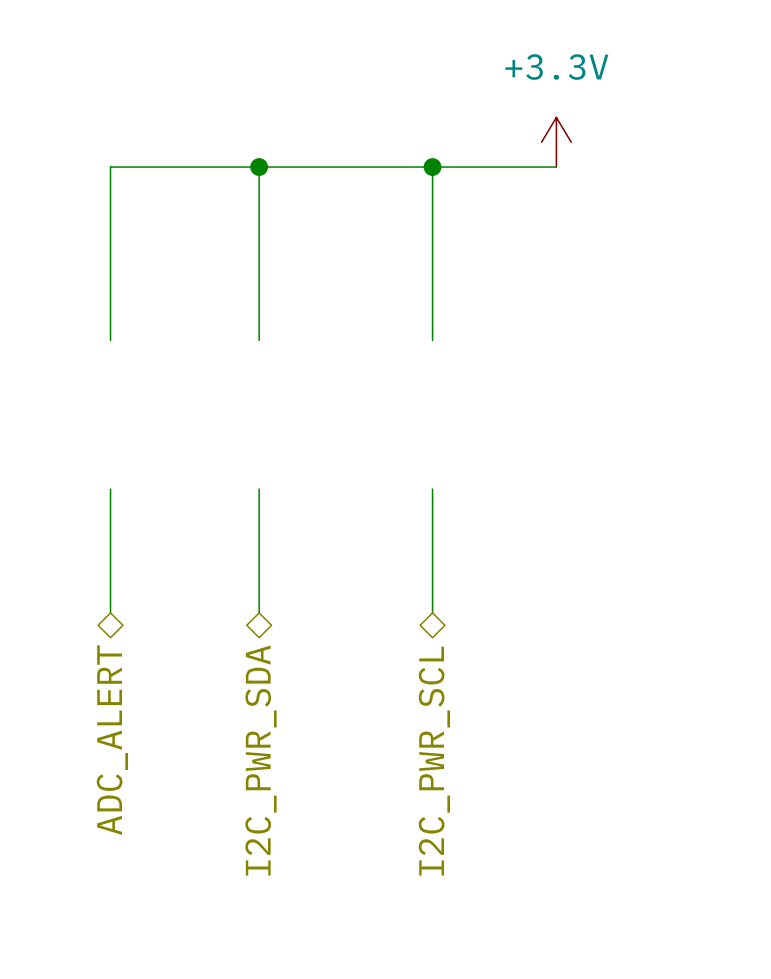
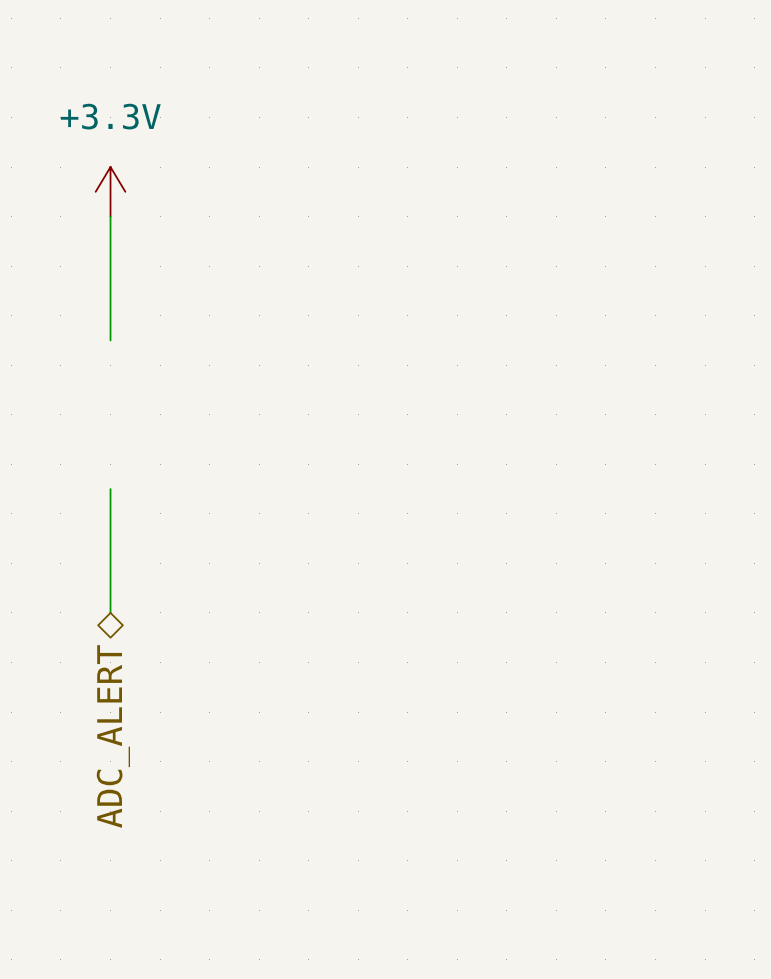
power symbol: +3.3V (556, 142) -> none
wire: (259, 167) (259, 340) -> none
junction: (259, 167) -> none
wire: (432, 167) (432, 340) -> none
junction: (432, 167) -> none
wire: (556, 167) (110, 167) (110, 216) -> none
power symbol: none -> +3.3V (110, 191)
wire: (259, 489) (259, 612) -> none
wire: (432, 489) (432, 612) -> none
hierarchical label: I2C_PWR_SDA (261, 760) -> none
hierarchical label: I2C_PWR_SCL (434, 761) -> none

